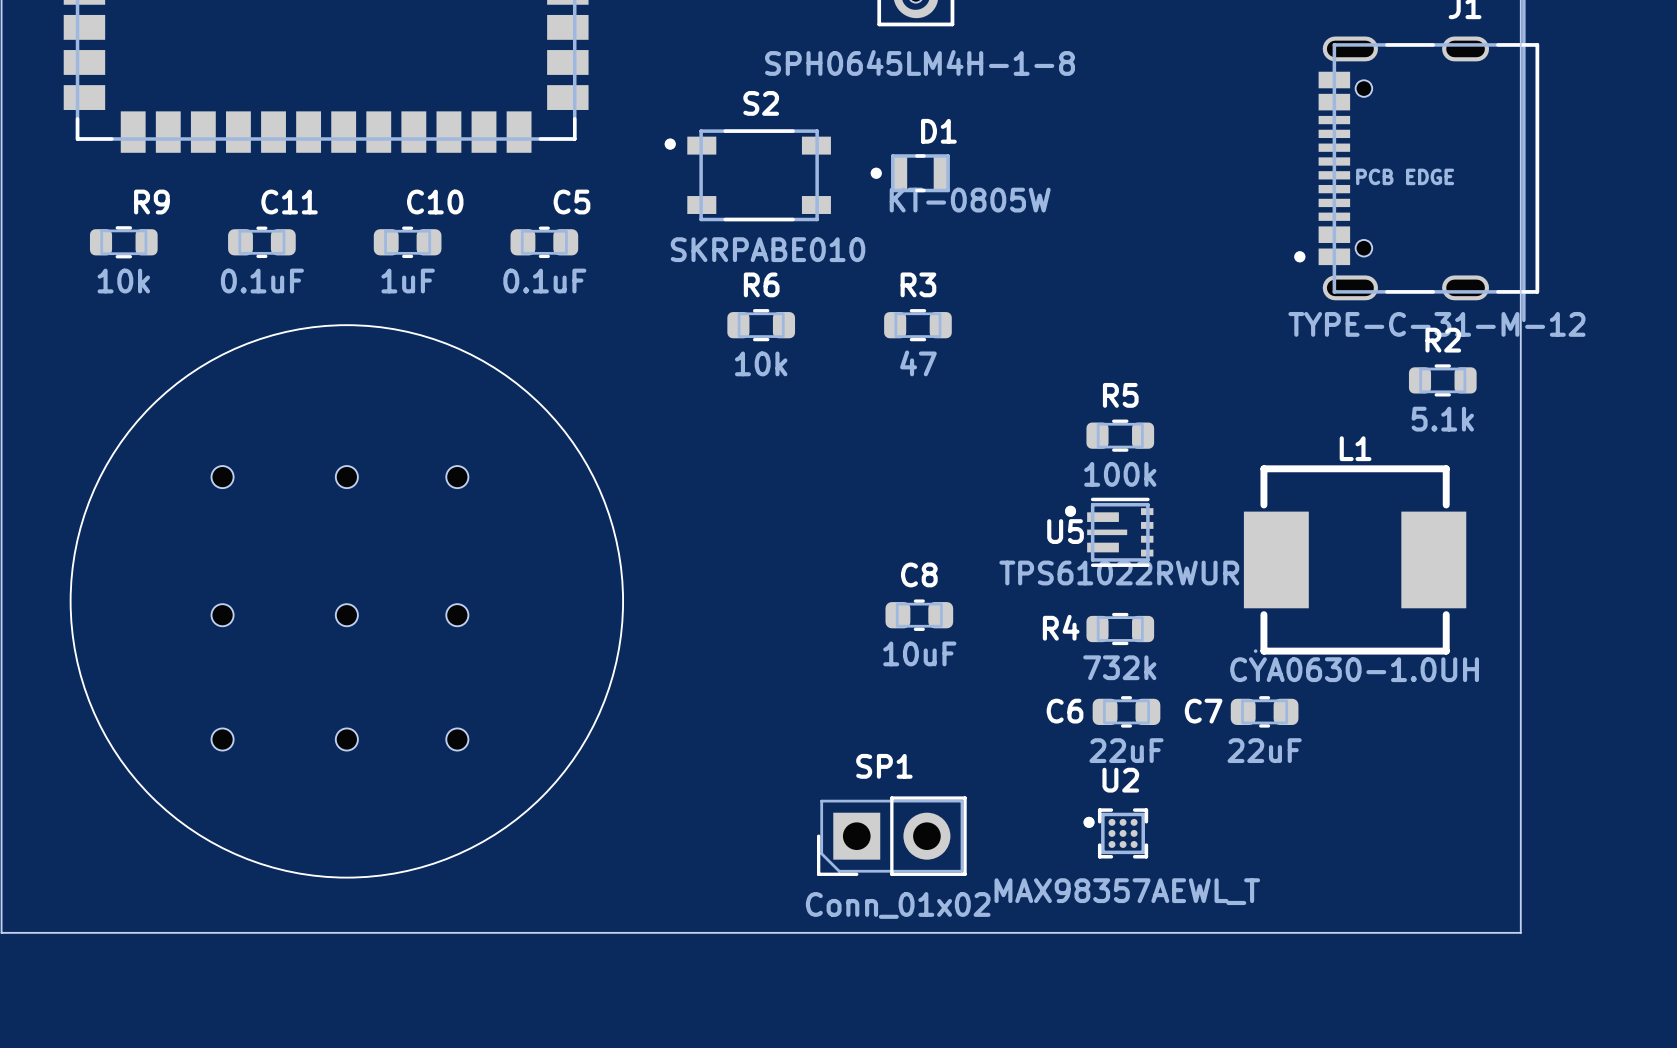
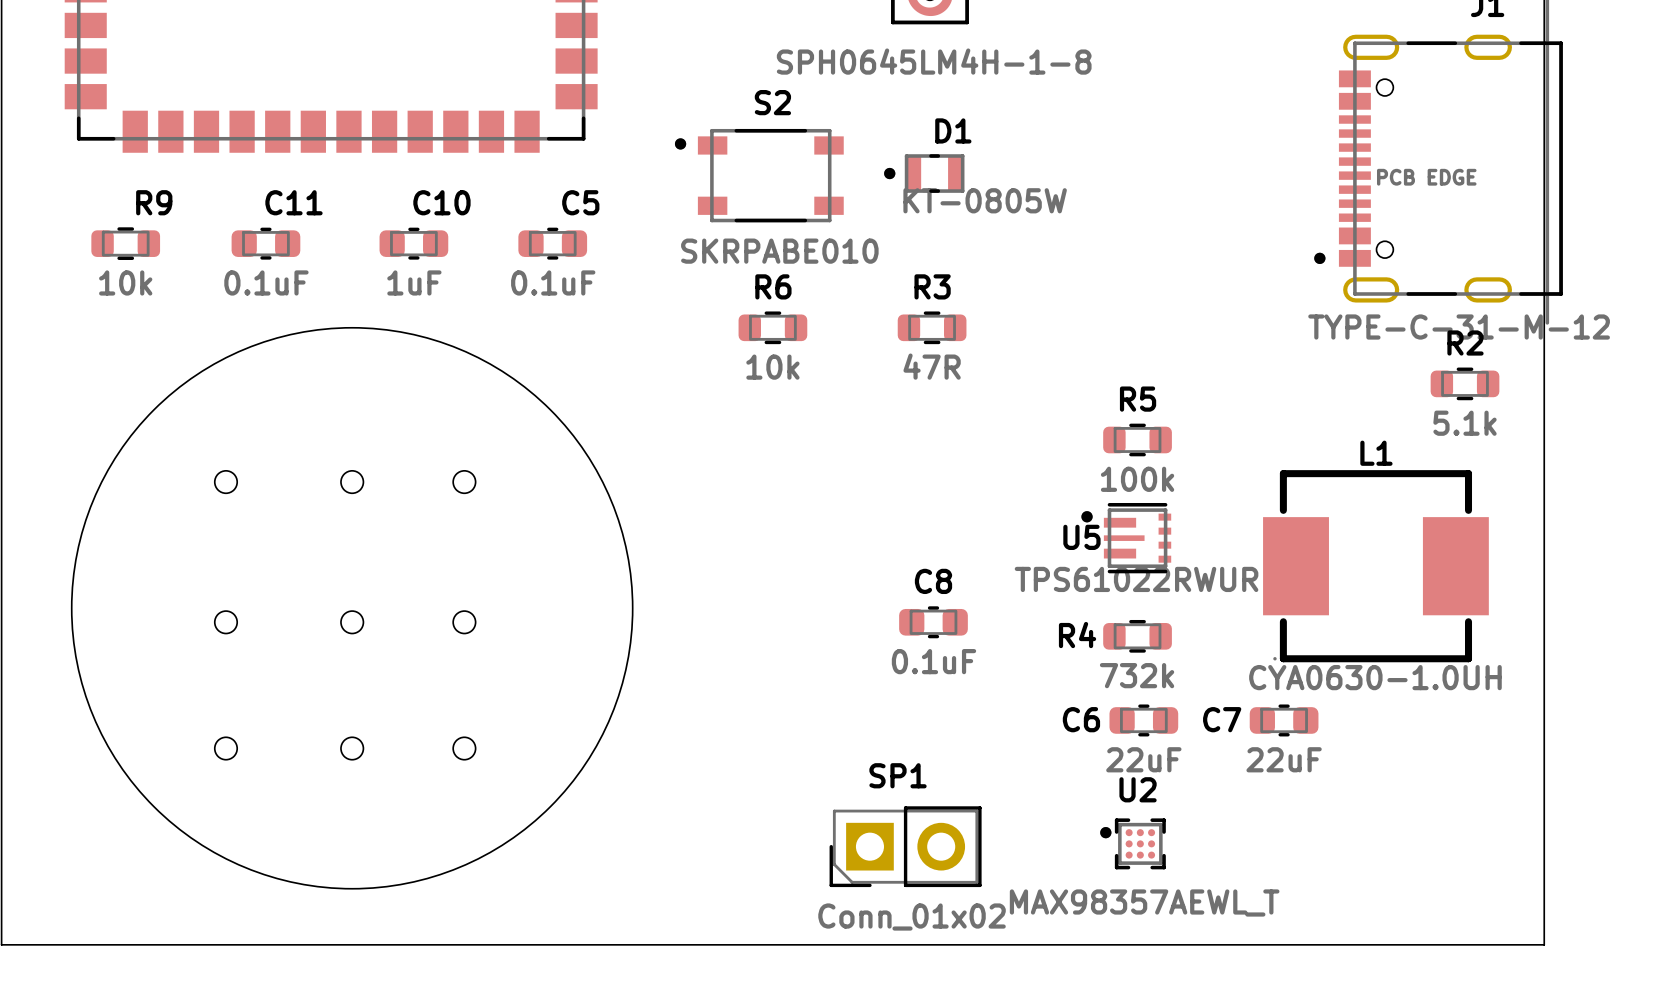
R3 value: 47 (918, 363) -> 47R (932, 366)
C8 value: 10uF (919, 653) -> 0.1uF (933, 661)

